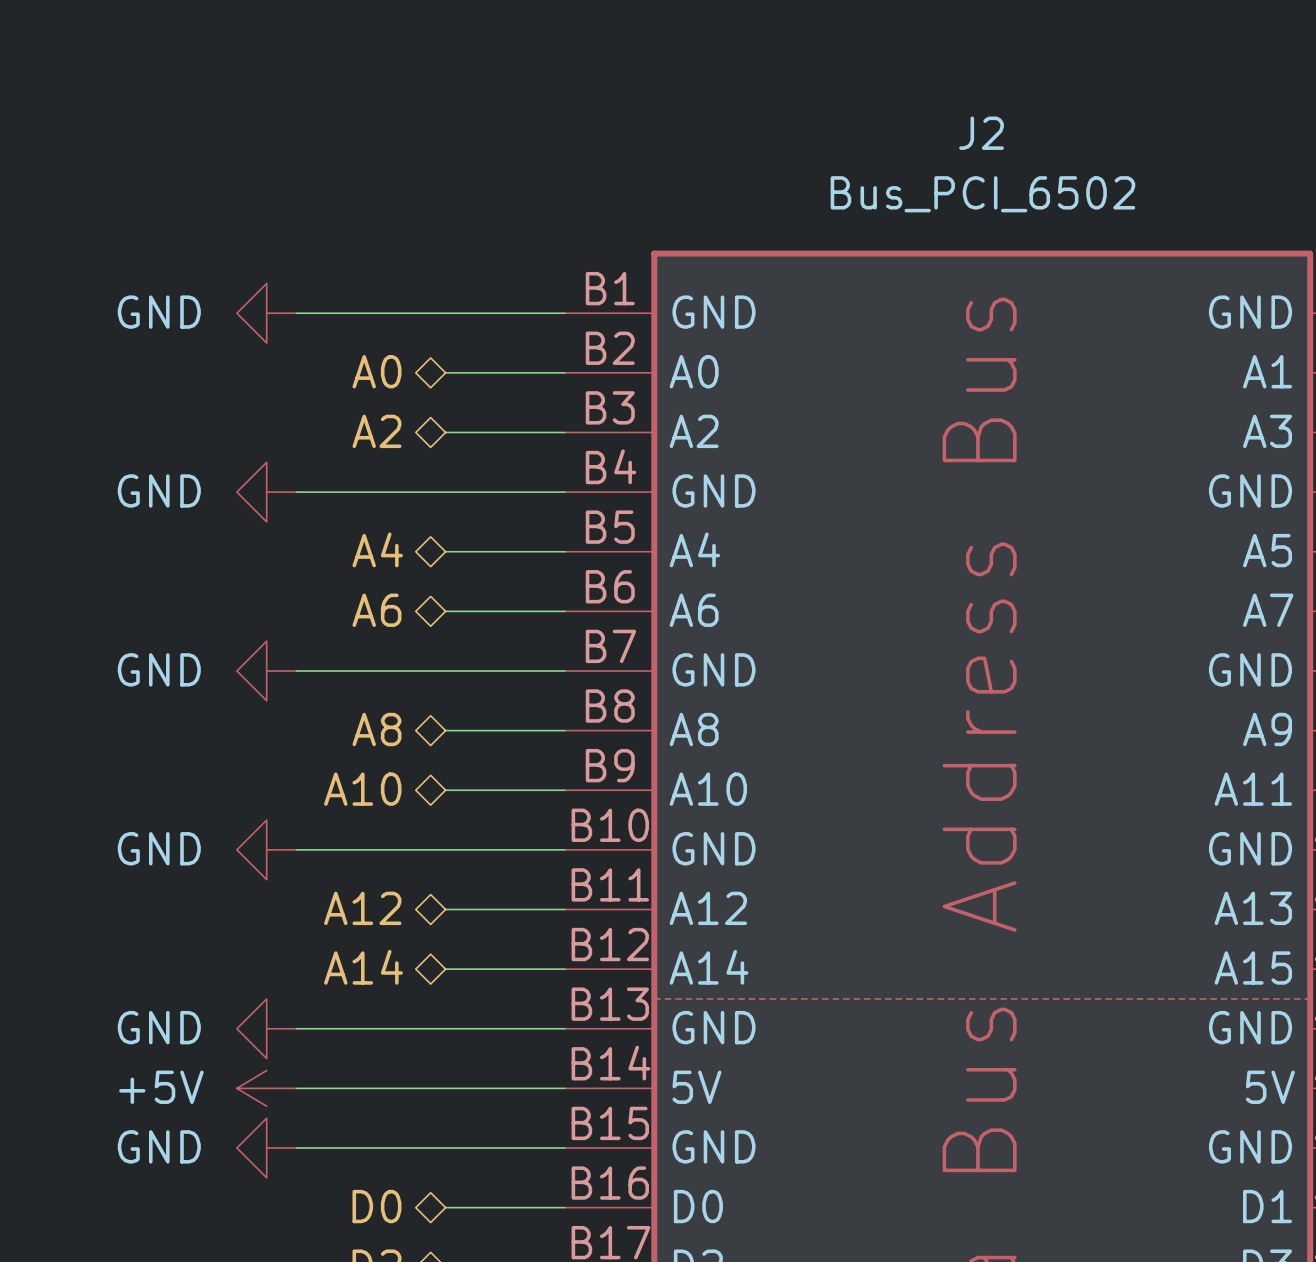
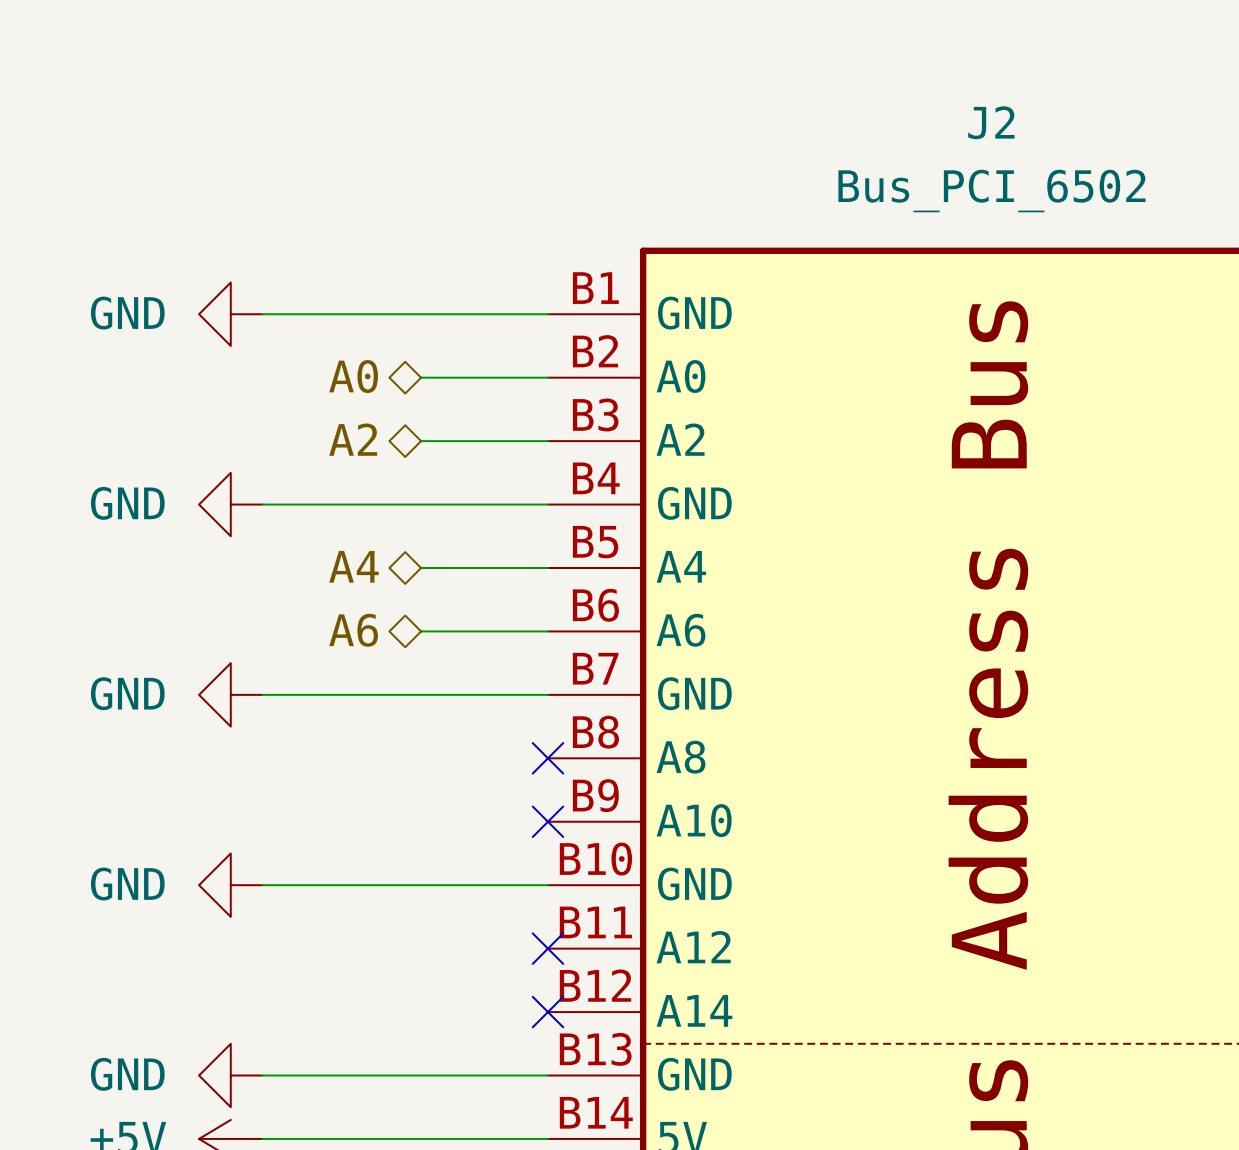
hierarchical label: A8 (376, 729) -> none
wire: (445, 730) (564, 730) -> none
no-connect mark: none -> (547, 758)
hierarchical label: A10 (362, 789) -> none
wire: (445, 790) (564, 790) -> none
no-connect mark: none -> (547, 821)
hierarchical label: A12 (362, 908) -> none
wire: (445, 909) (564, 909) -> none
no-connect mark: none -> (547, 948)
hierarchical label: A14 (363, 967) -> none
wire: (445, 969) (564, 969) -> none
no-connect mark: none -> (547, 1012)

